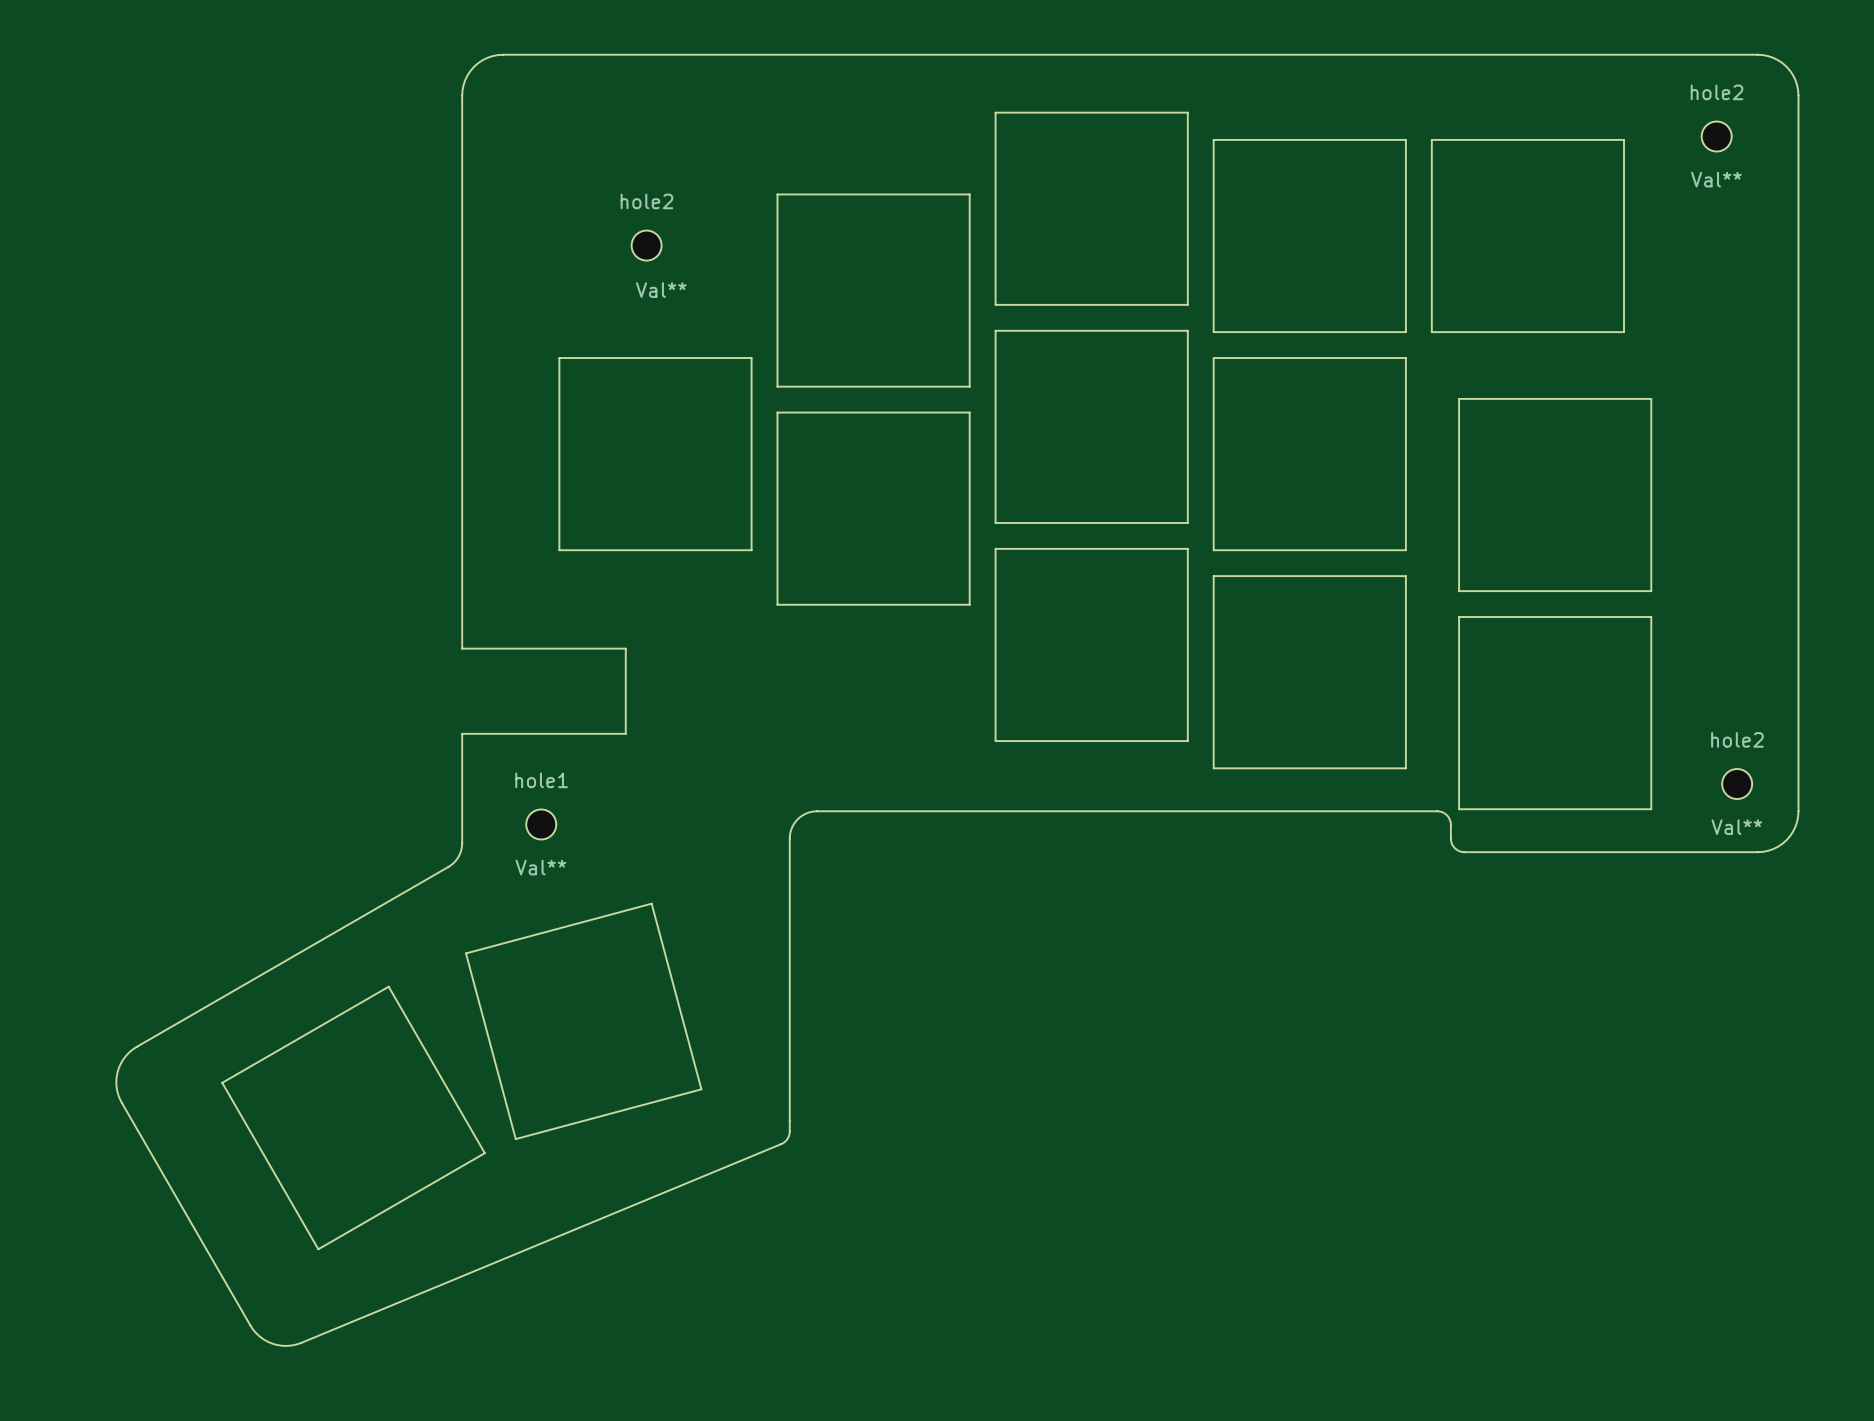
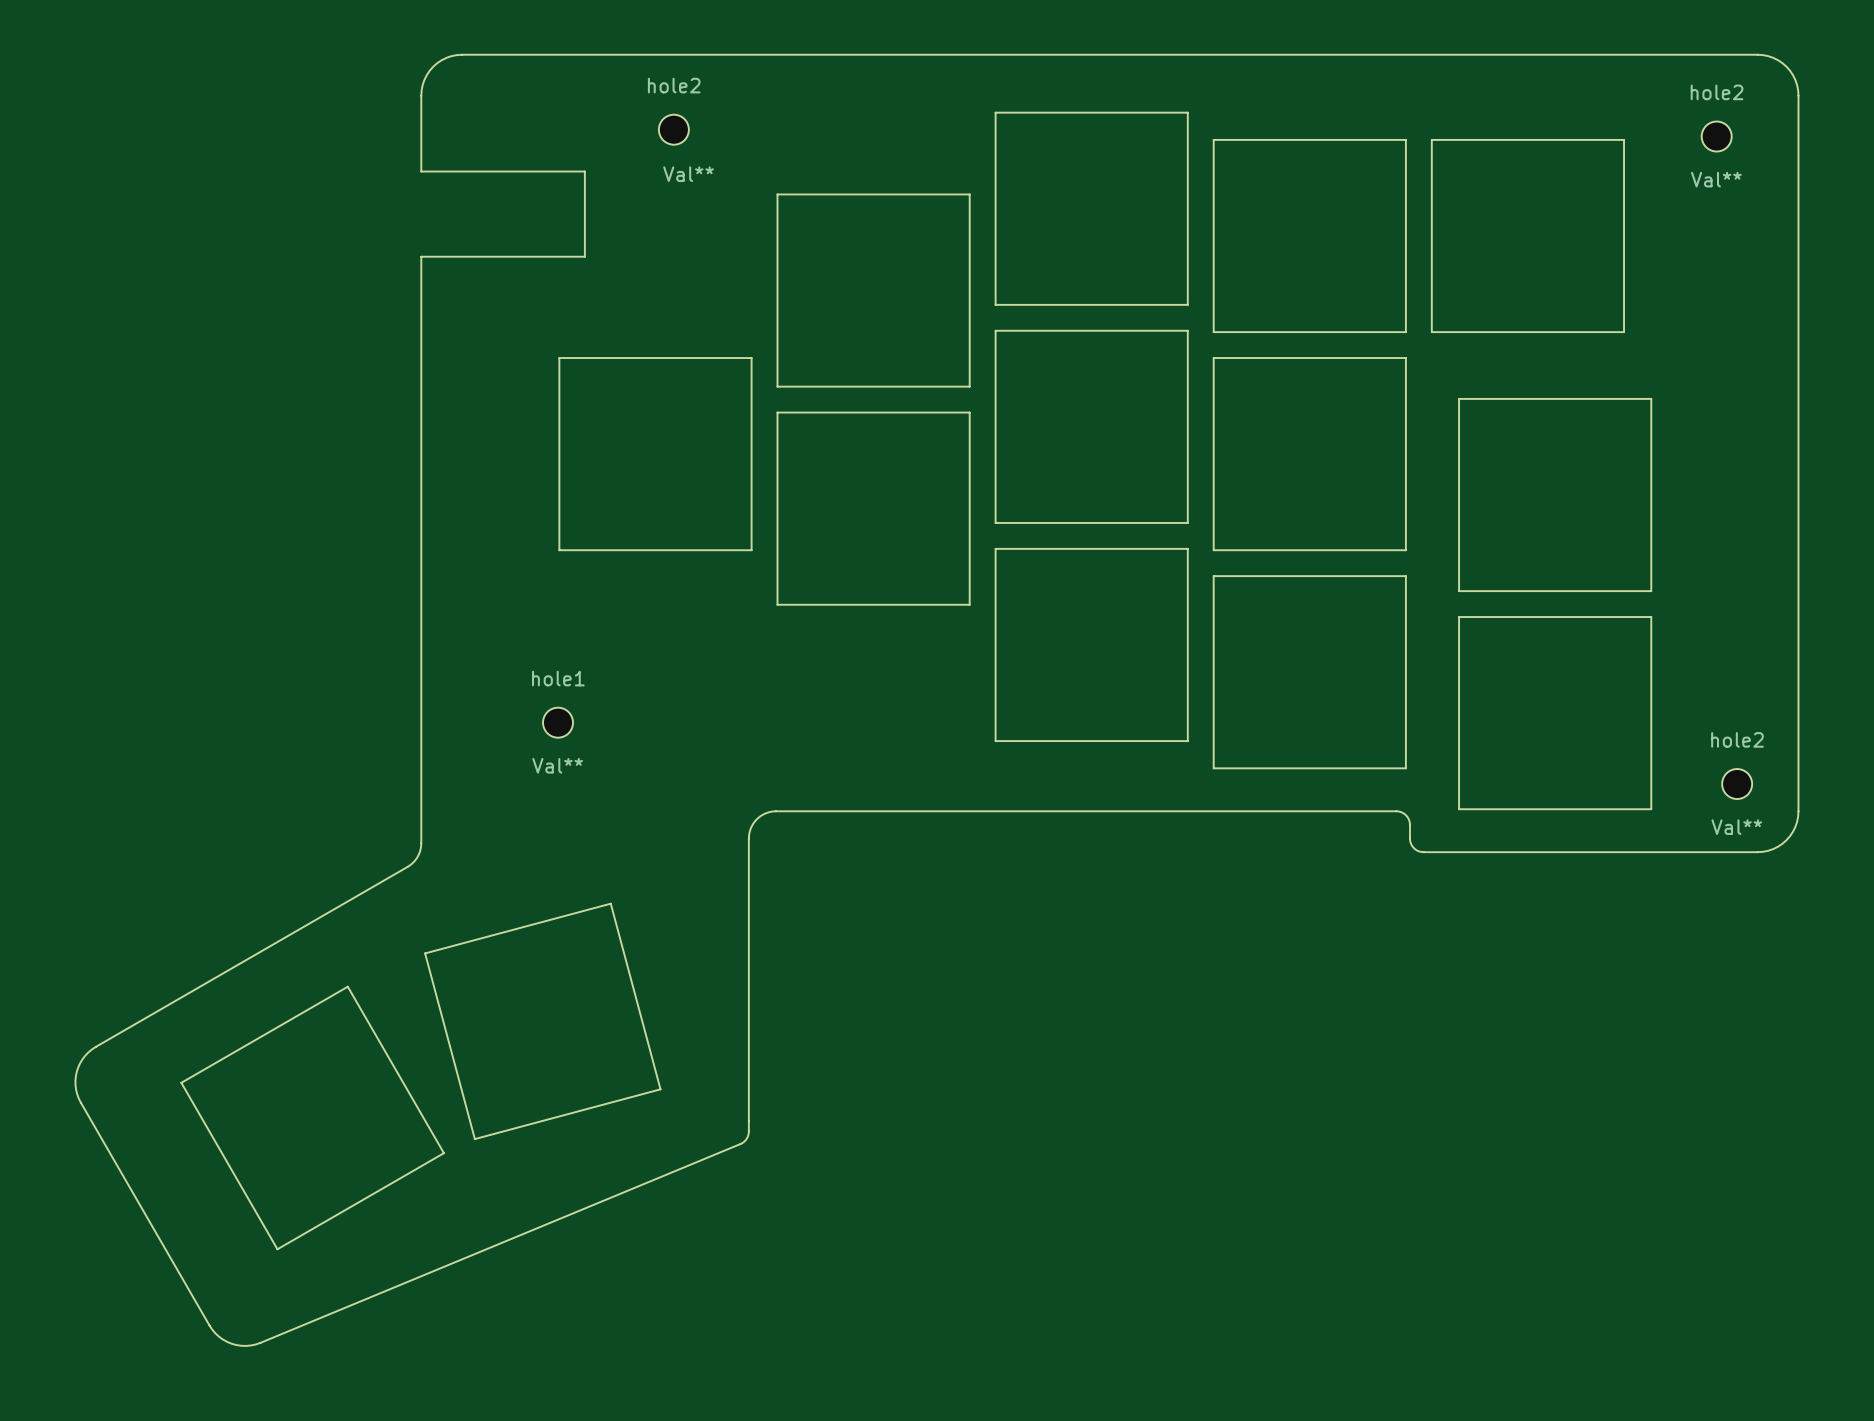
board edge: (503, 54) (487, 57) (478, 63) (467, 75) (462, 90) (462, 648) (625, 648) (625, 733) (462, 733) (462, 846) (459, 854) (453, 863) (136, 1046) (123, 1059) (116, 1076) (117, 1089) (119, 1098) (256, 1333) (263, 1339) (277, 1345) (287, 1345) (301, 1342) (785, 1141) (789, 1131) (789, 835) (792, 826) (797, 819) (805, 813) (817, 811) -> (503, 54) (451, 56) (437, 63) (429, 70) (421, 90) (421, 171) (584, 171) (584, 256) (421, 256) (421, 843) (418, 854) (407, 866) (95, 1046) (85, 1055) (76, 1071) (76, 1089) (80, 1102) (215, 1333) (227, 1341) (236, 1345) (251, 1345) (260, 1342) (744, 1141) (748, 1131) (749, 832) (756, 819) (767, 812) (817, 811)
hole2 position: (646, 245) -> (673, 129)
board edge: (1396, 811) (1437, 811) (1444, 813) (1450, 821) (1452, 844) (1457, 850) (1464, 852) -> (1396, 811) (1403, 813) (1408, 819) (1410, 841) (1416, 850) (1423, 852) (1464, 852)
hole1 position: (541, 824) -> (558, 722)
drawing position: (583, 1021) -> (542, 1021)
drawing position: (353, 1118) -> (312, 1118)

